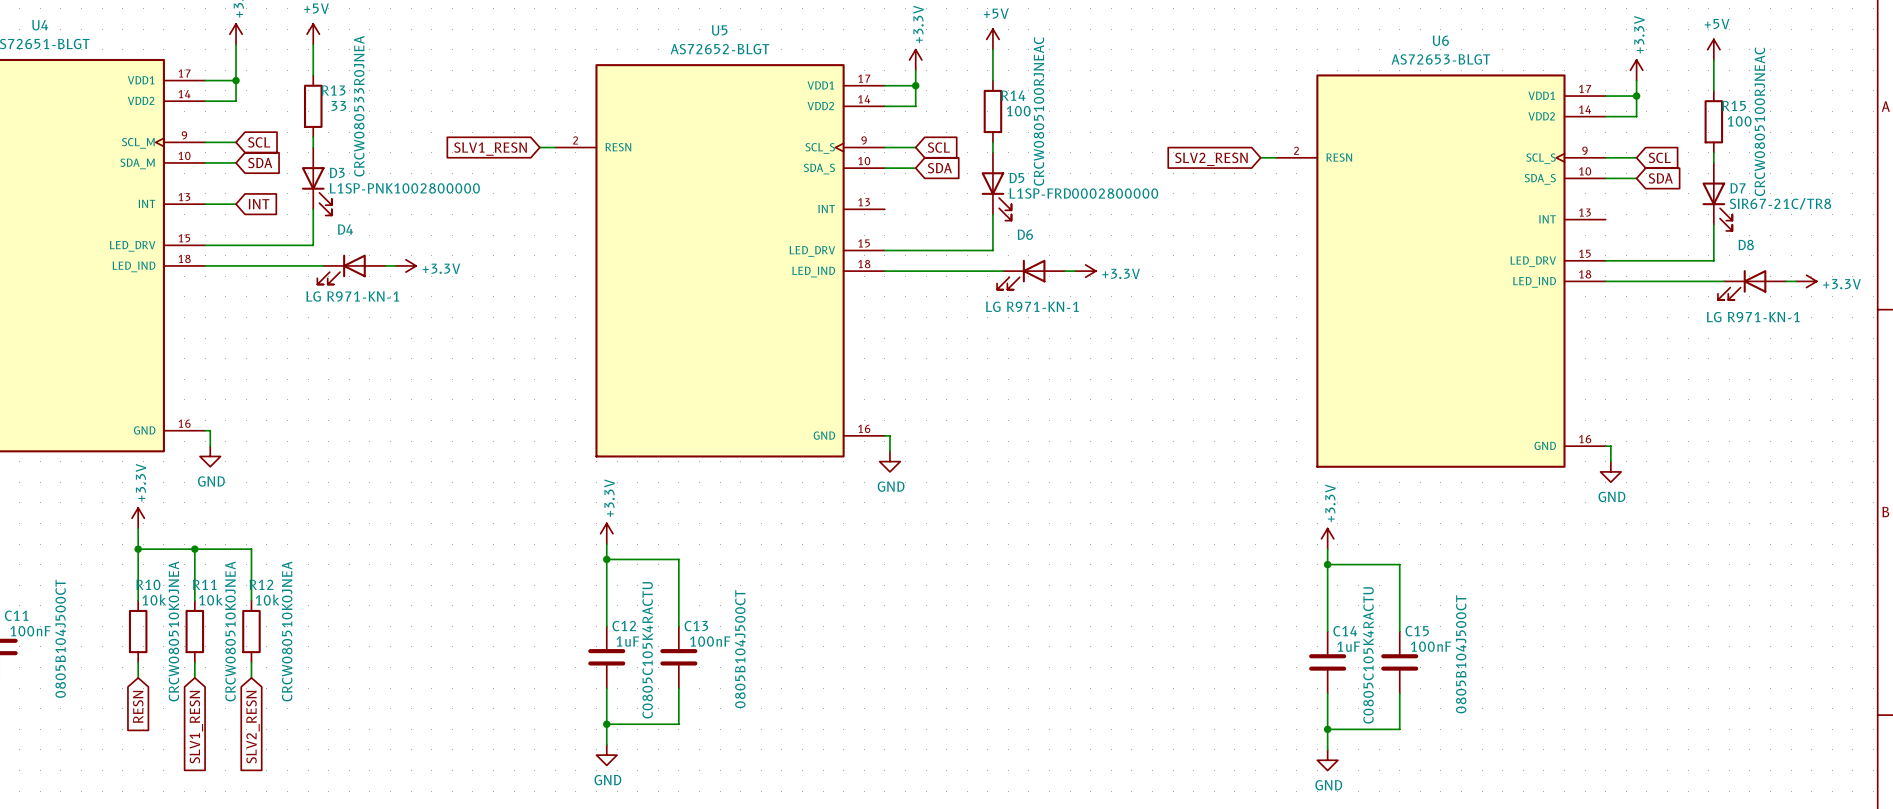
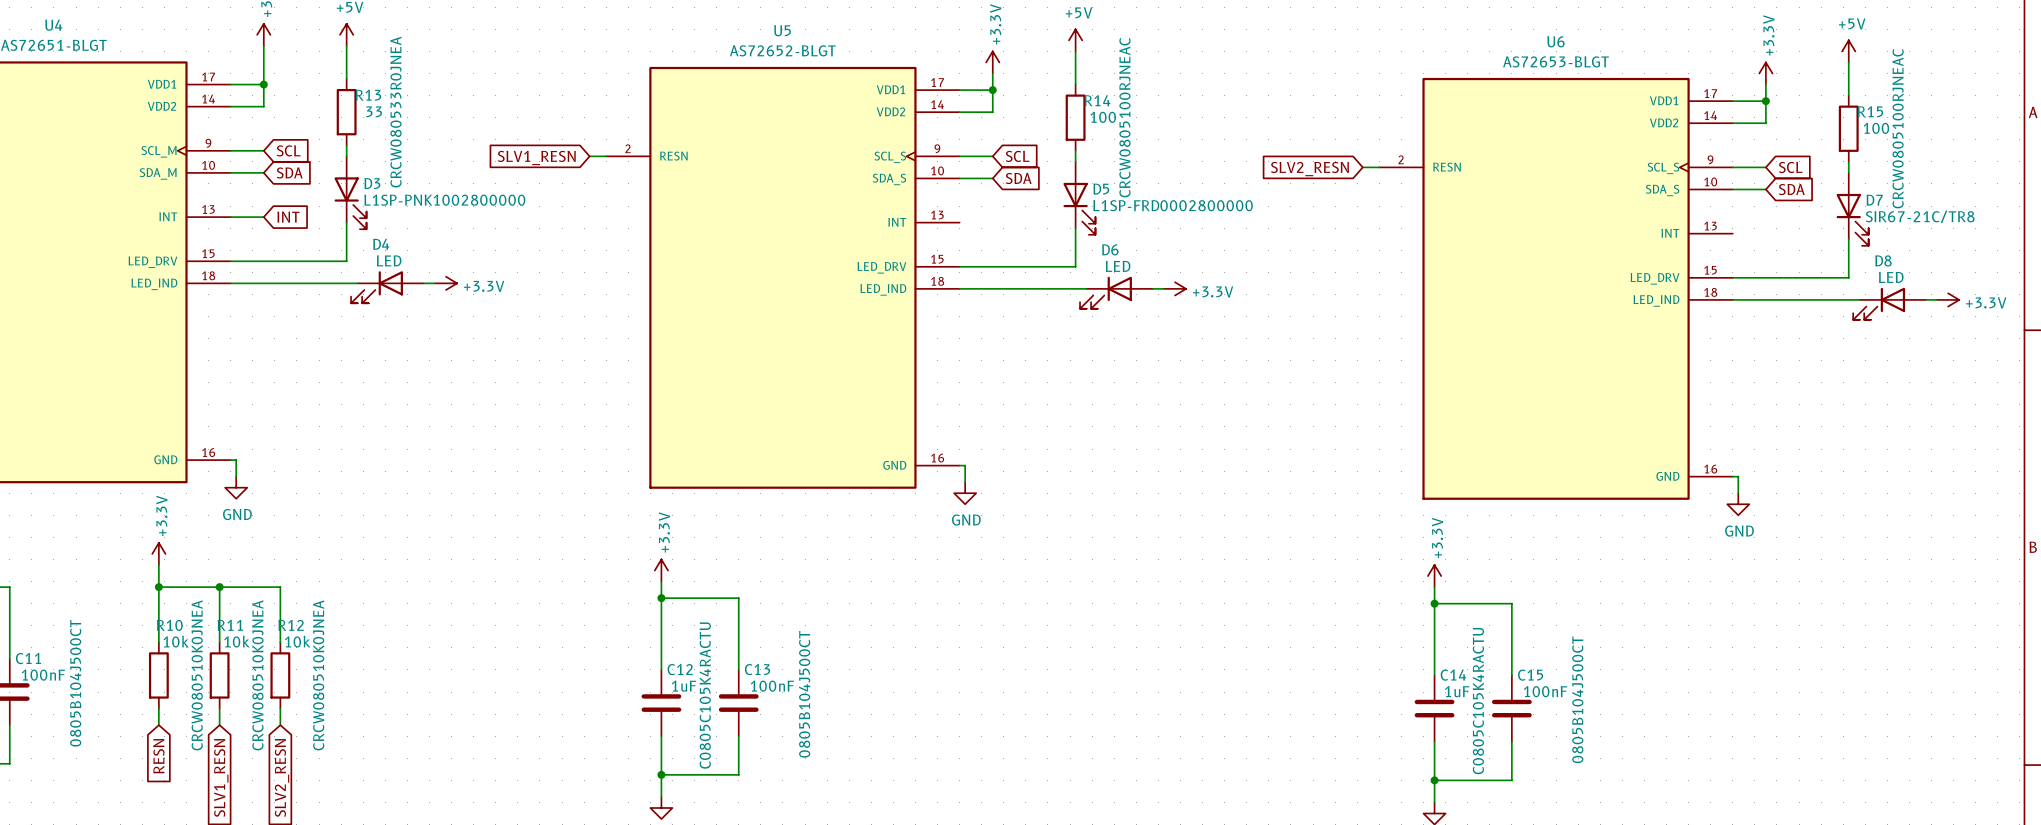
D4 value: LG R971-KN-1 (352, 296) -> LED (389, 260)
D6 value: LG R971-KN-1 (1032, 306) -> LED (1118, 266)
D8 value: LG R971-KN-1 (1753, 317) -> LED (1891, 277)

